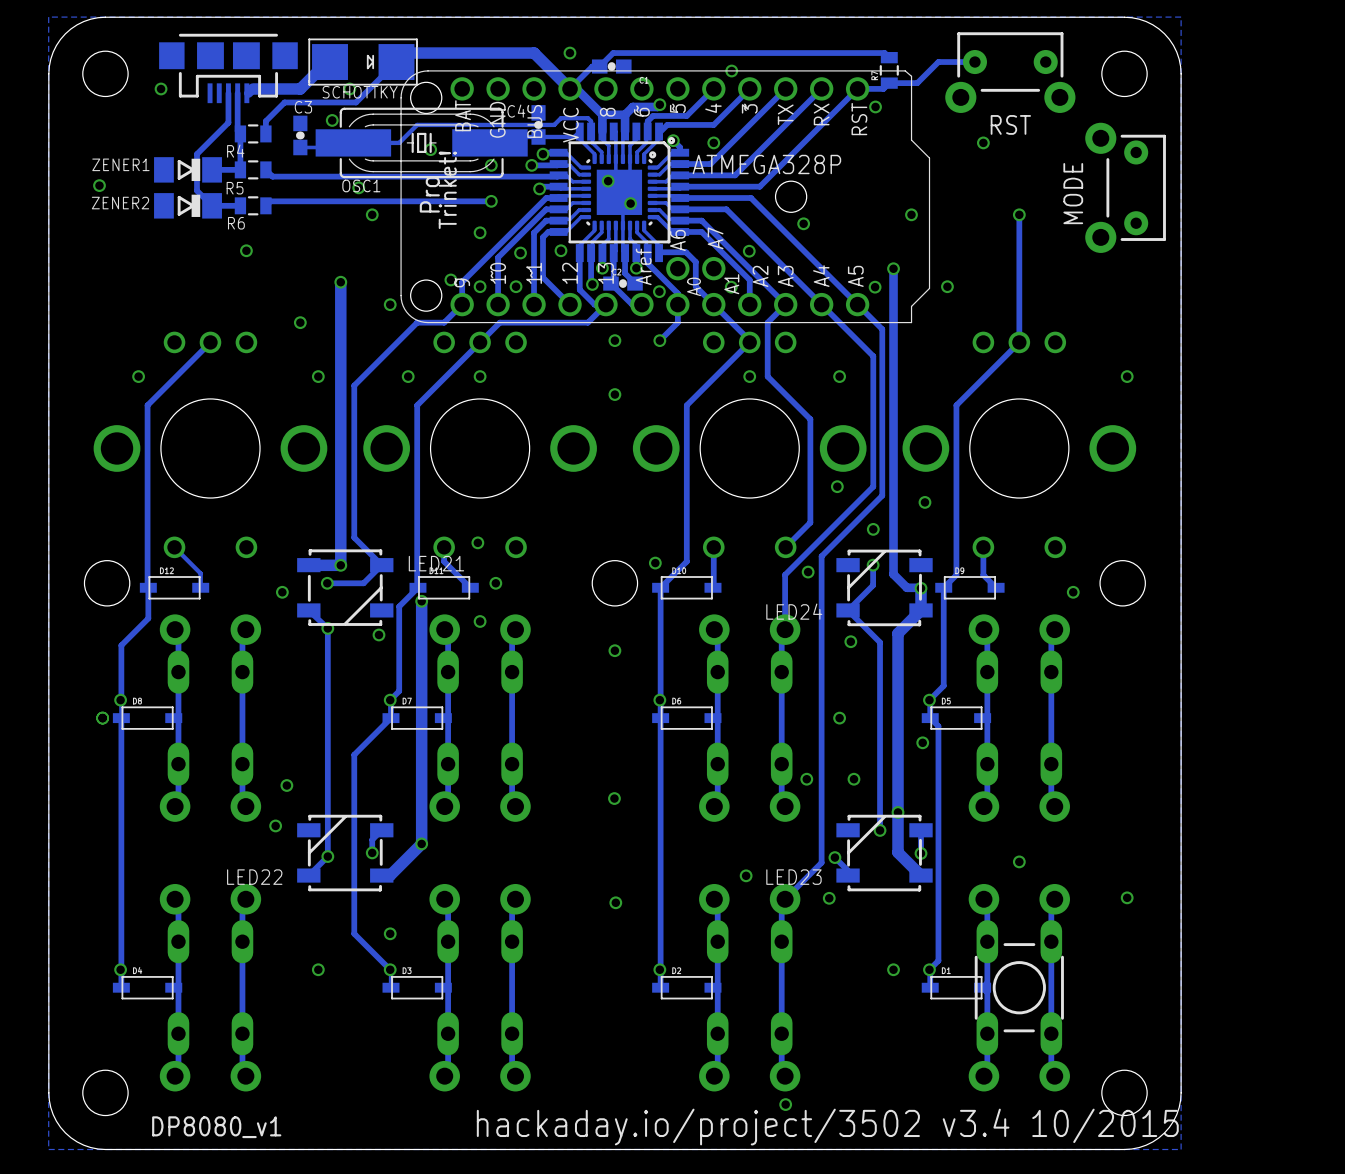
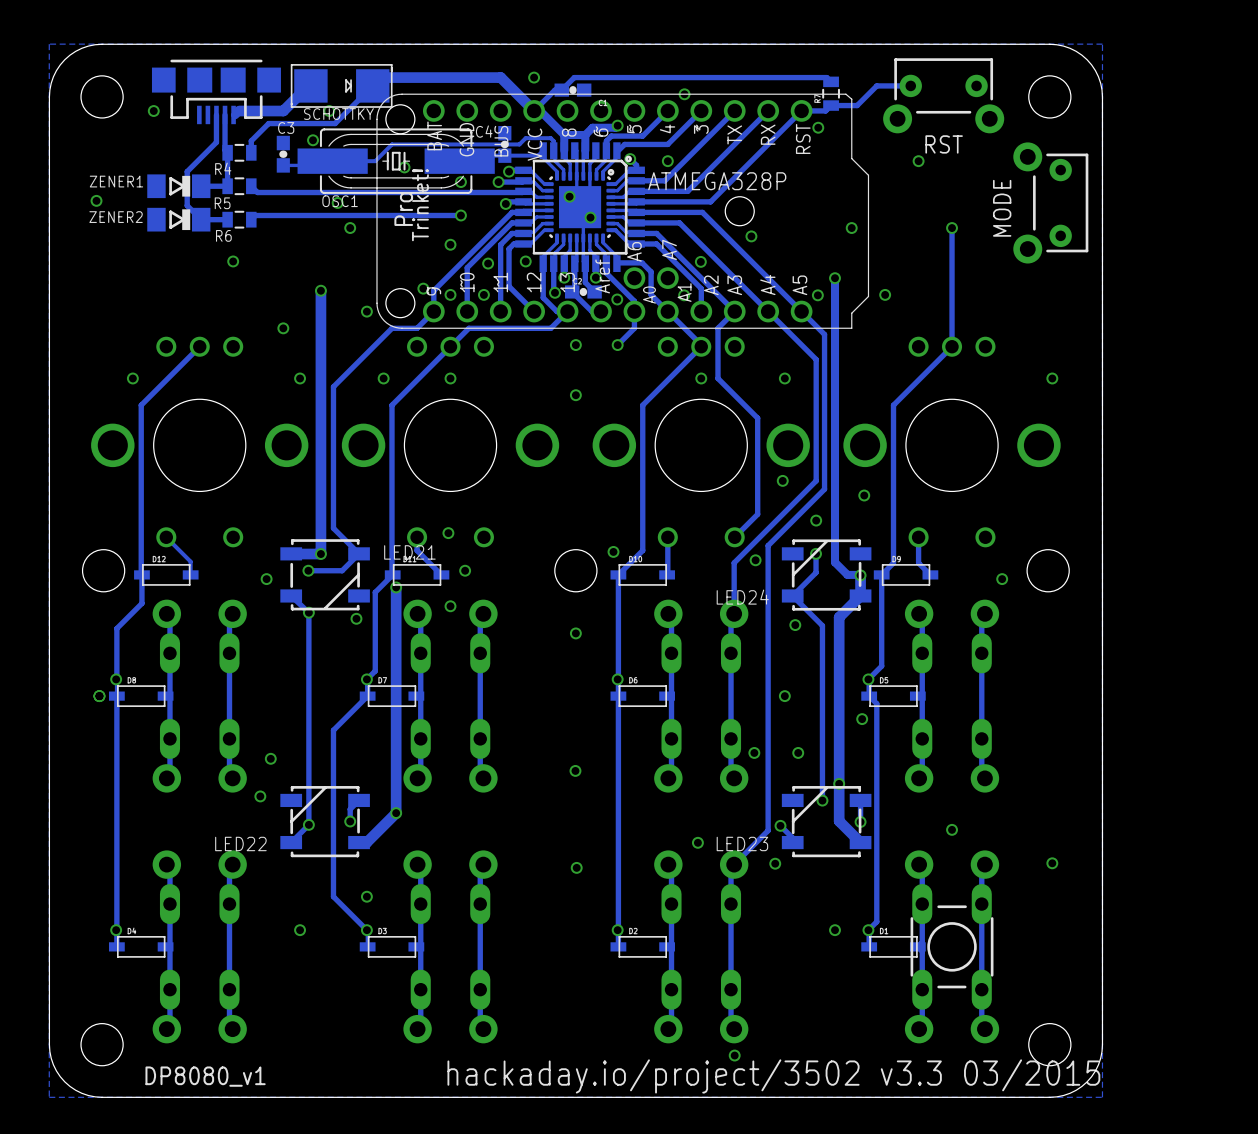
text: hackaday.io/project/3502 v3.4 10/2015 (827, 1127) -> hackaday.io/project/3502 v3.3 03/2015 (773, 1076)

